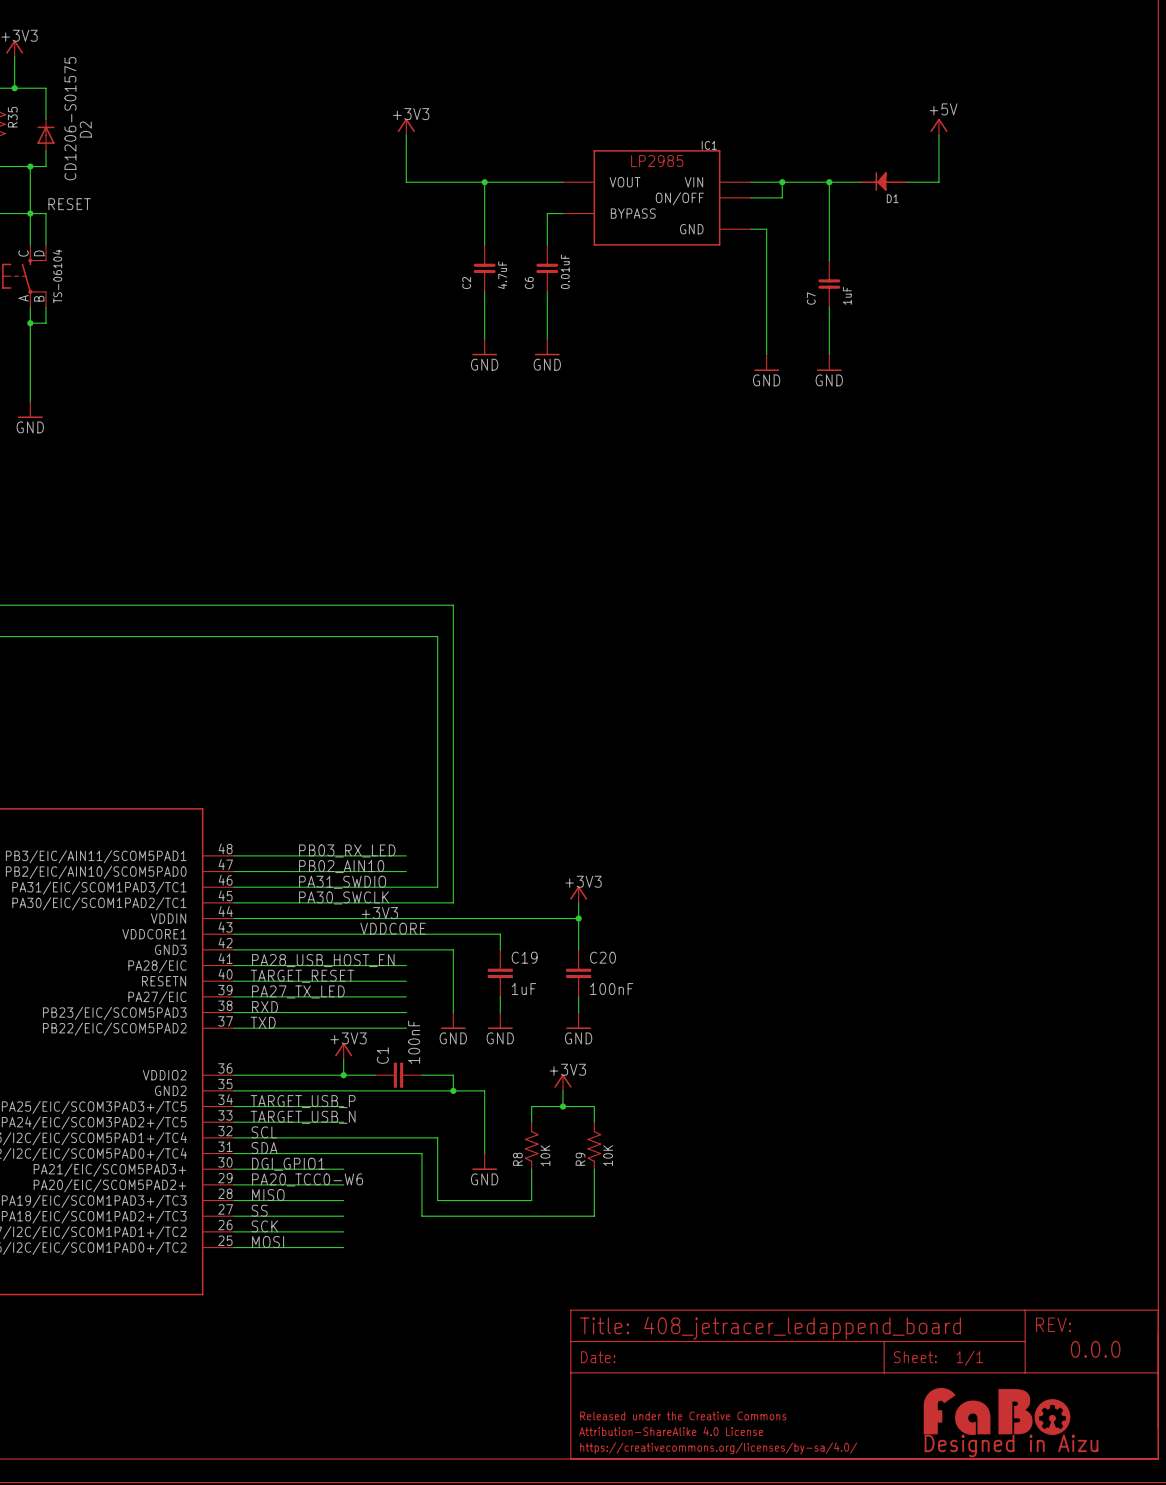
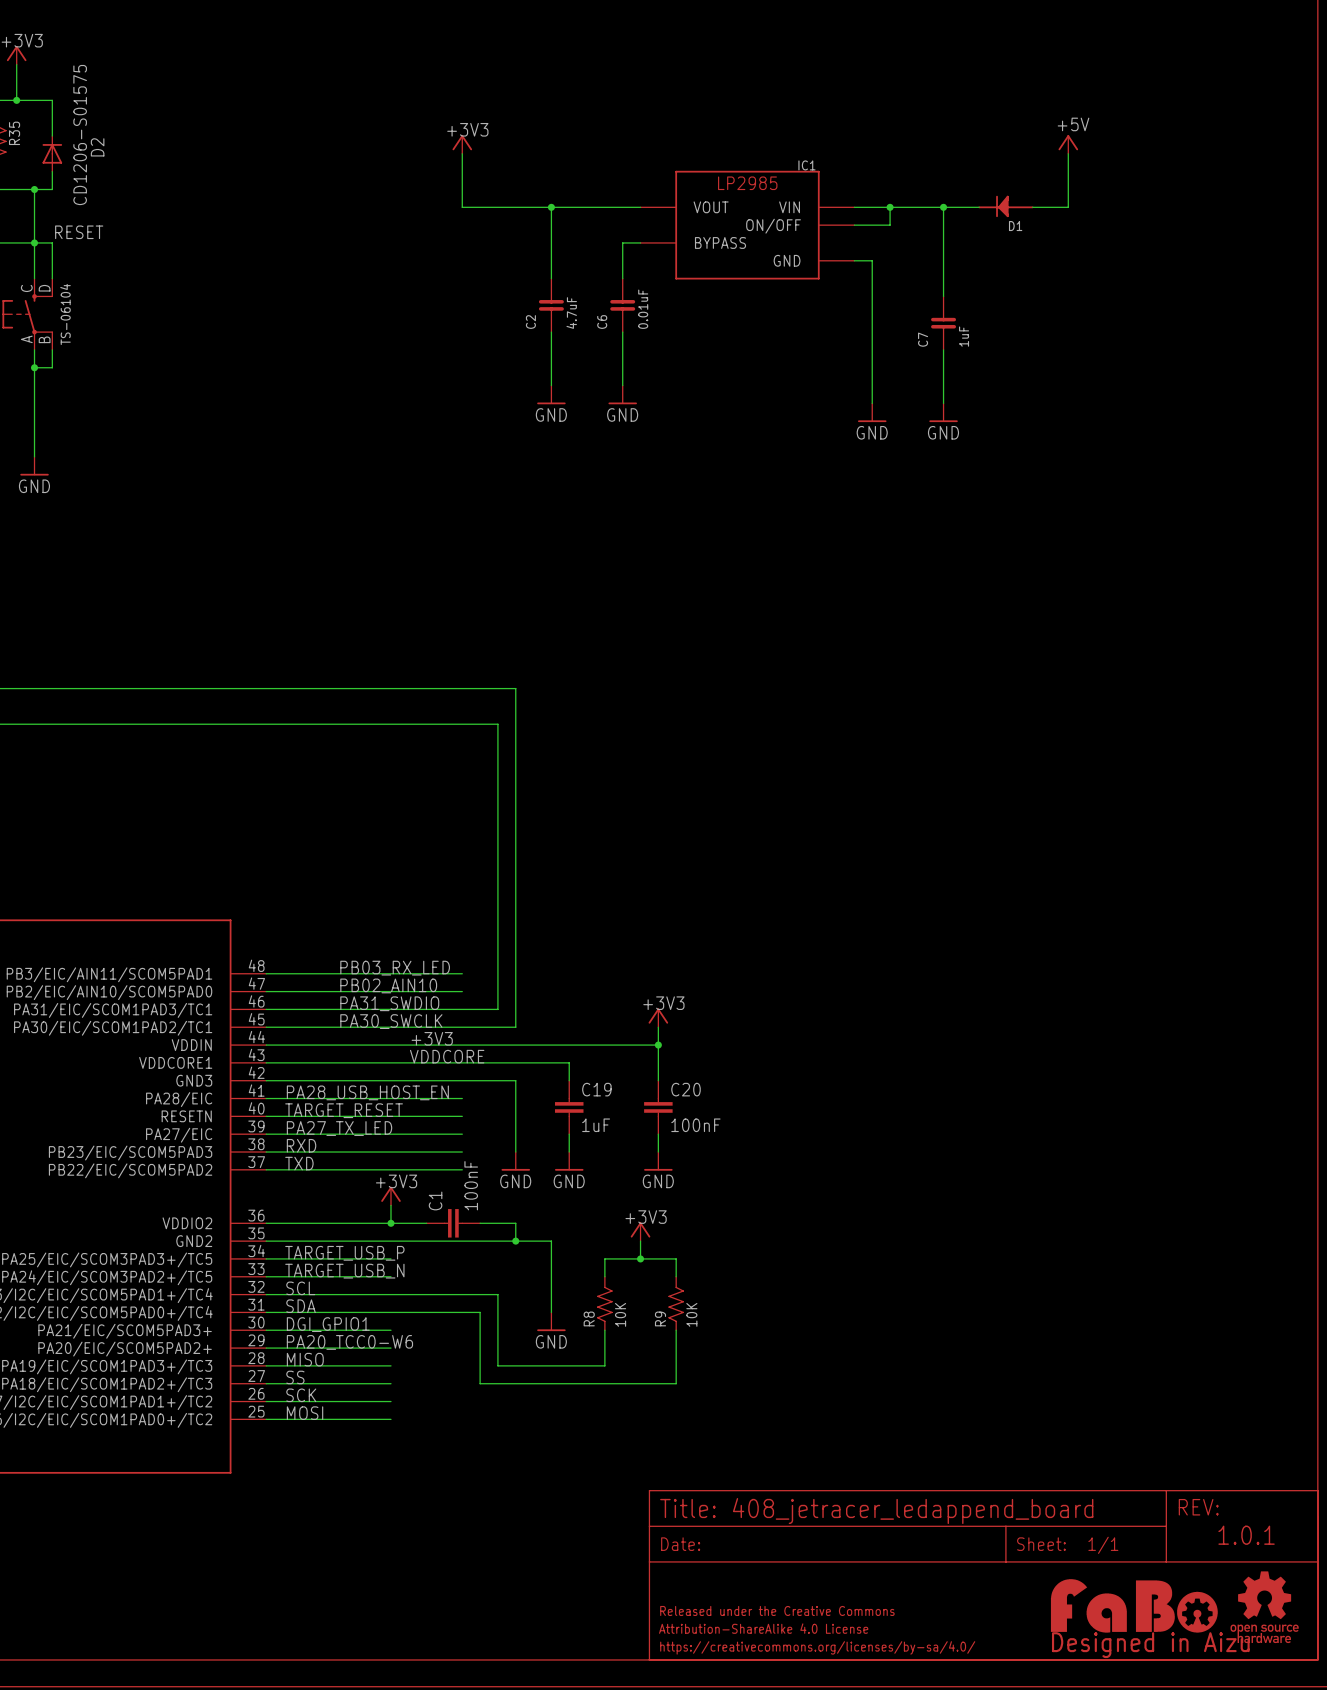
text: 0.0.0 (1095, 1349) -> 1.0.1 (1246, 1535)
part: none -> (1264, 1607)

